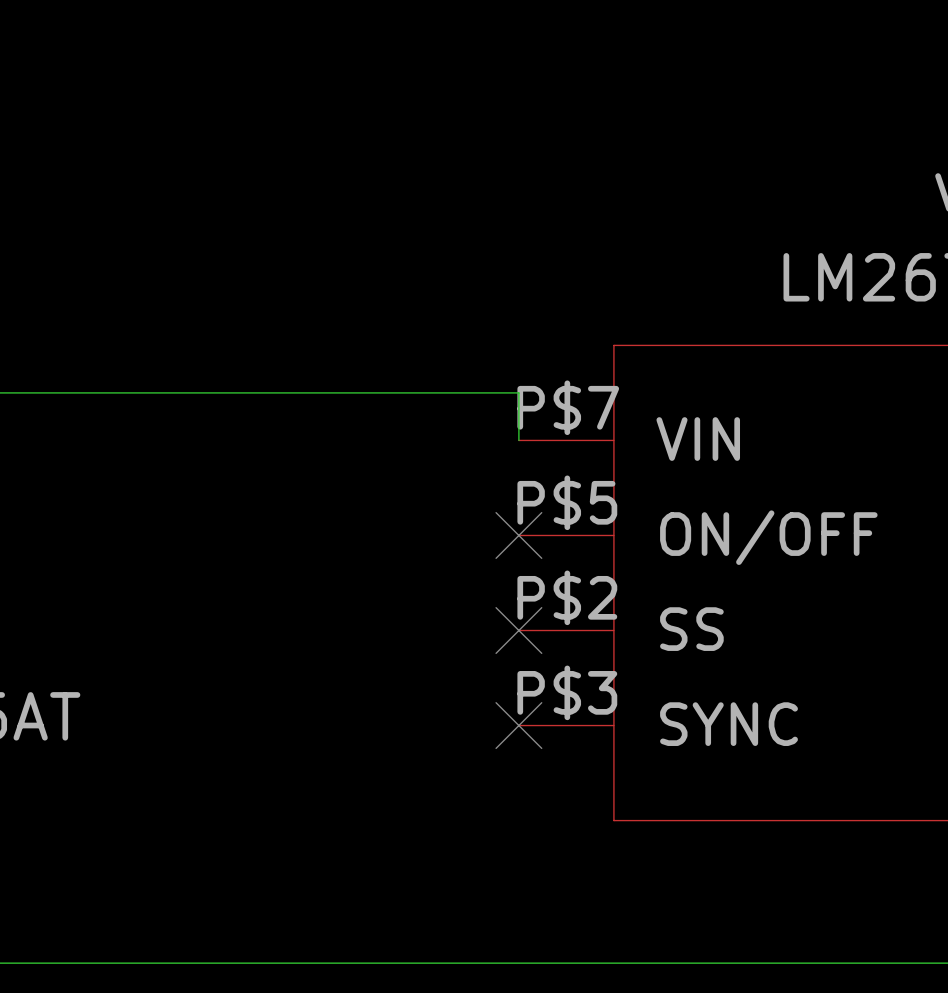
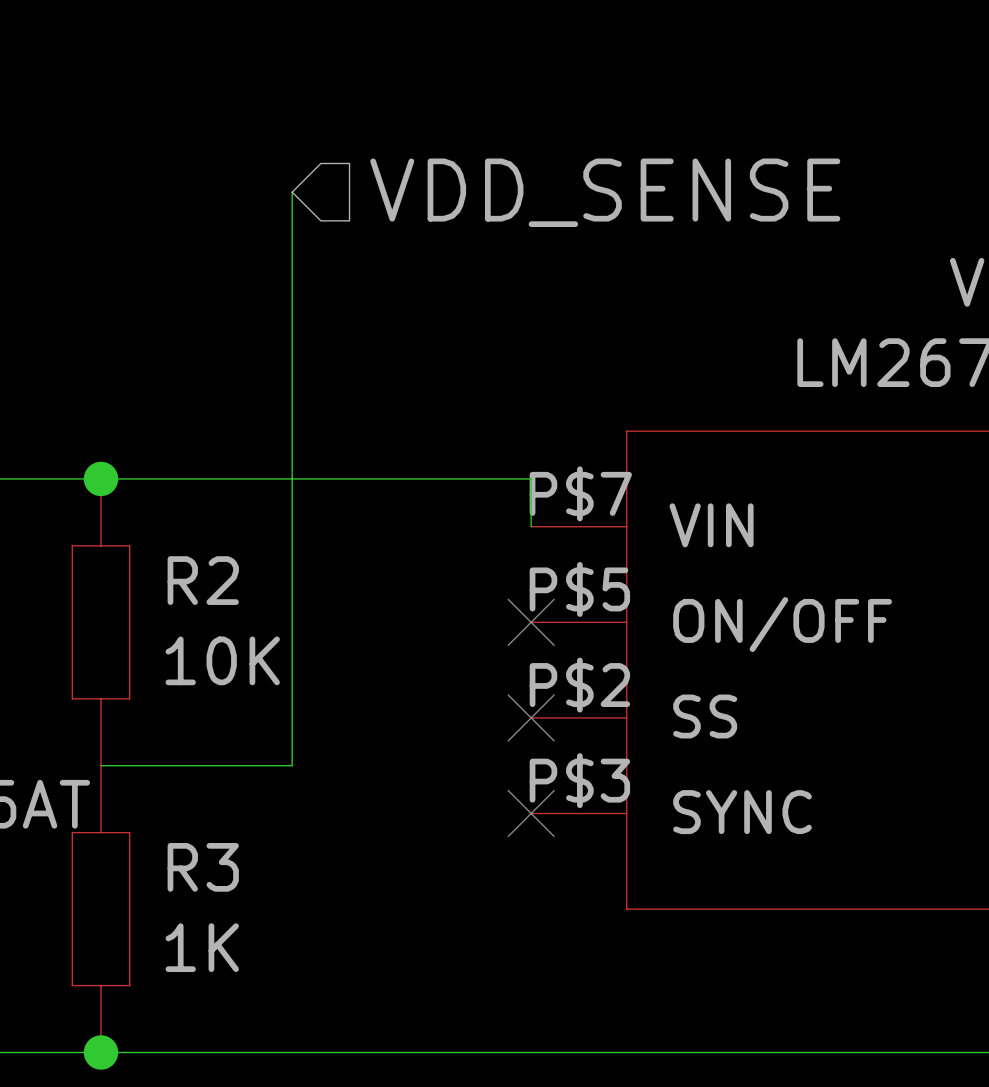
wire: none -> (292, 192) (292, 765) (101, 765)
hierarchical label: none -> VDD_SENSE (605, 192)
junction: none -> (101, 478)
R2: none -> 10K (101, 622)
R3: none -> 1K (101, 909)
junction: none -> (101, 1052)

